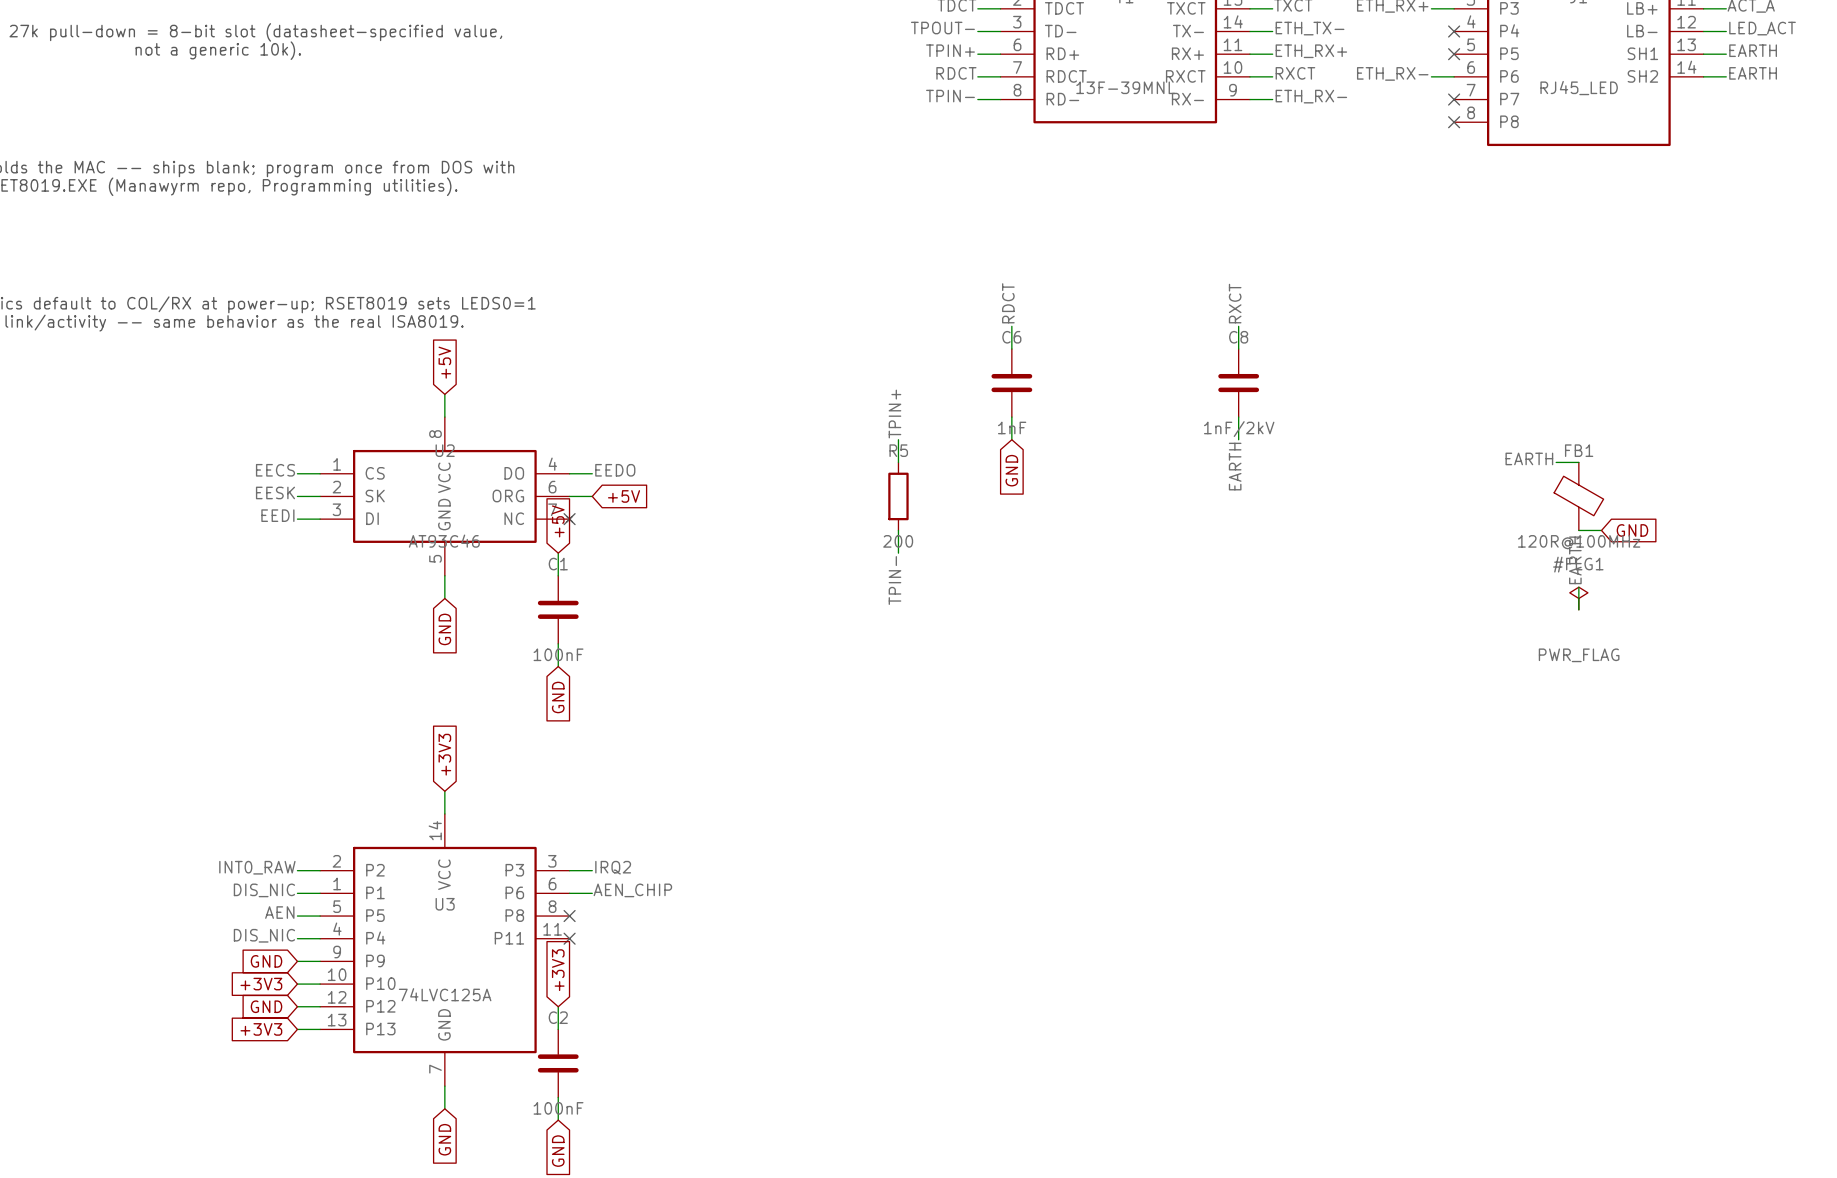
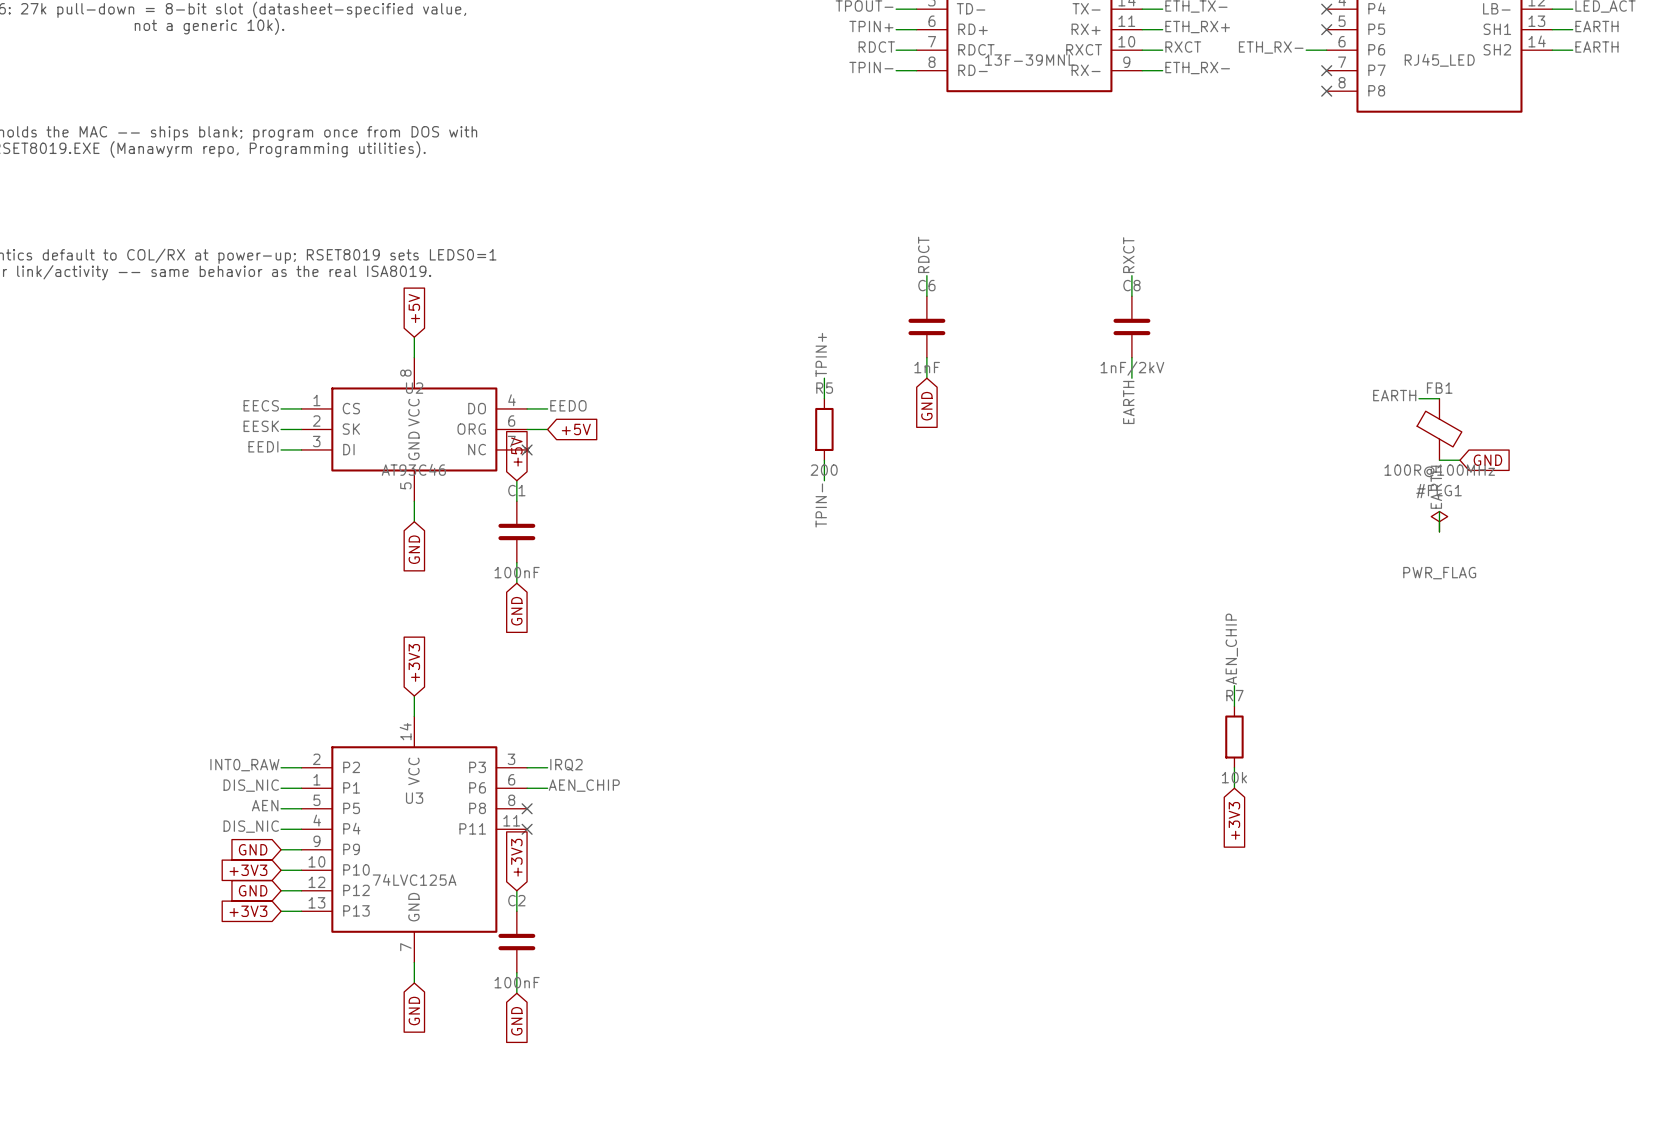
FB1 value: 120R@100MHz (1579, 542) -> 100R@100MHz (1439, 470)
label: none -> AEN_CHIP (1231, 649)
wire: none -> (1234, 685) (1234, 706)
R7: none -> 10k (1234, 737)
wire: none -> (1234, 767) (1234, 788)
global label: none -> +3V3 (1234, 820)

